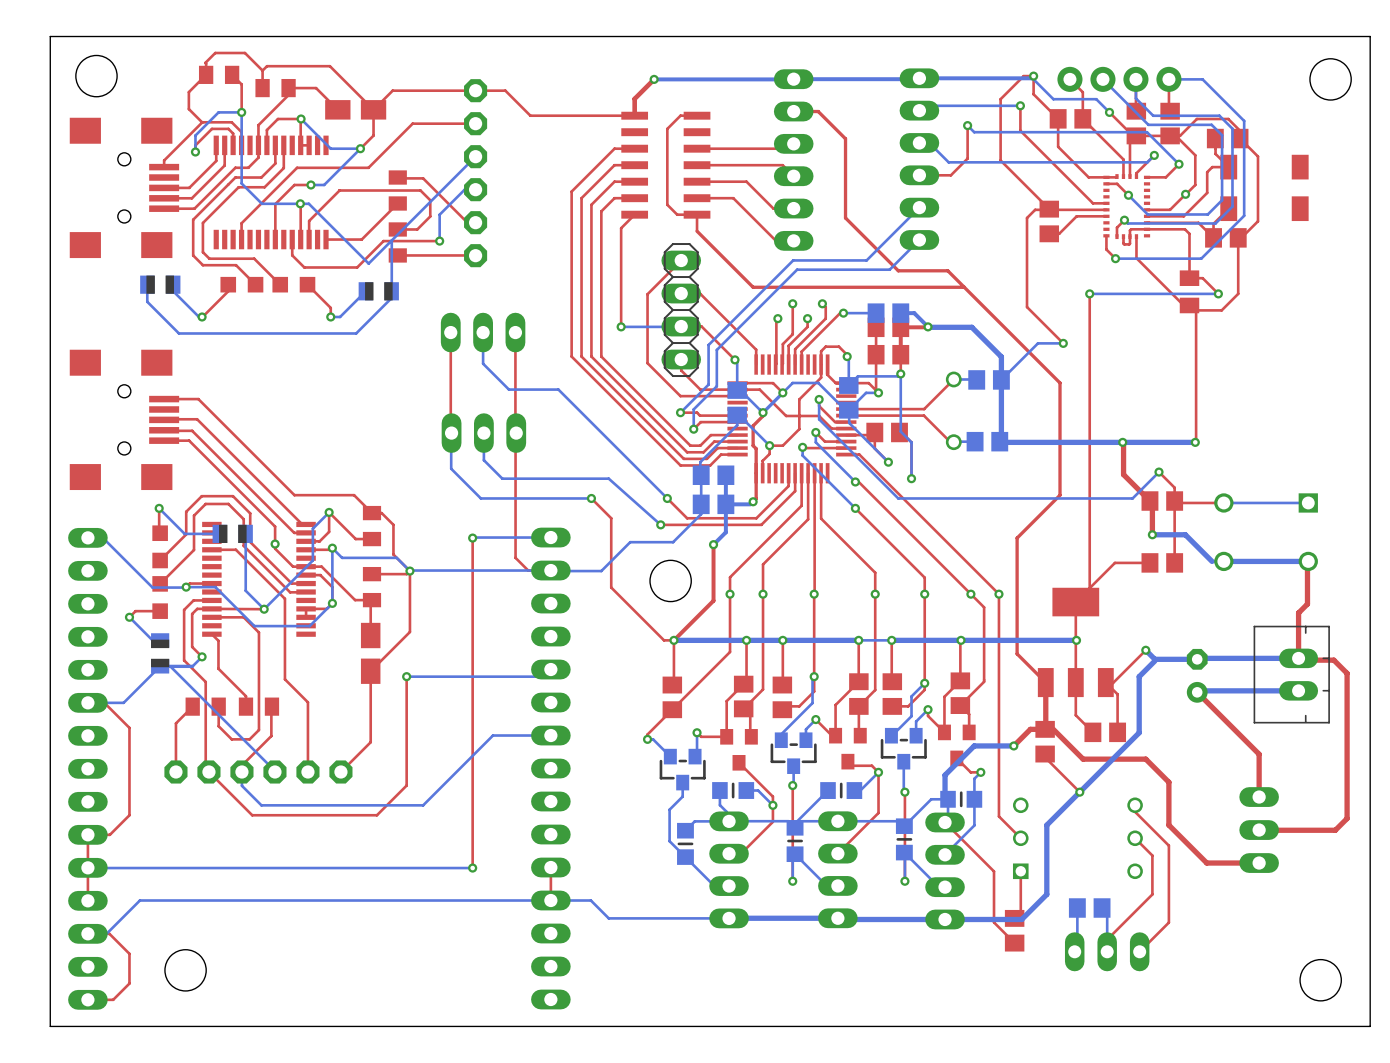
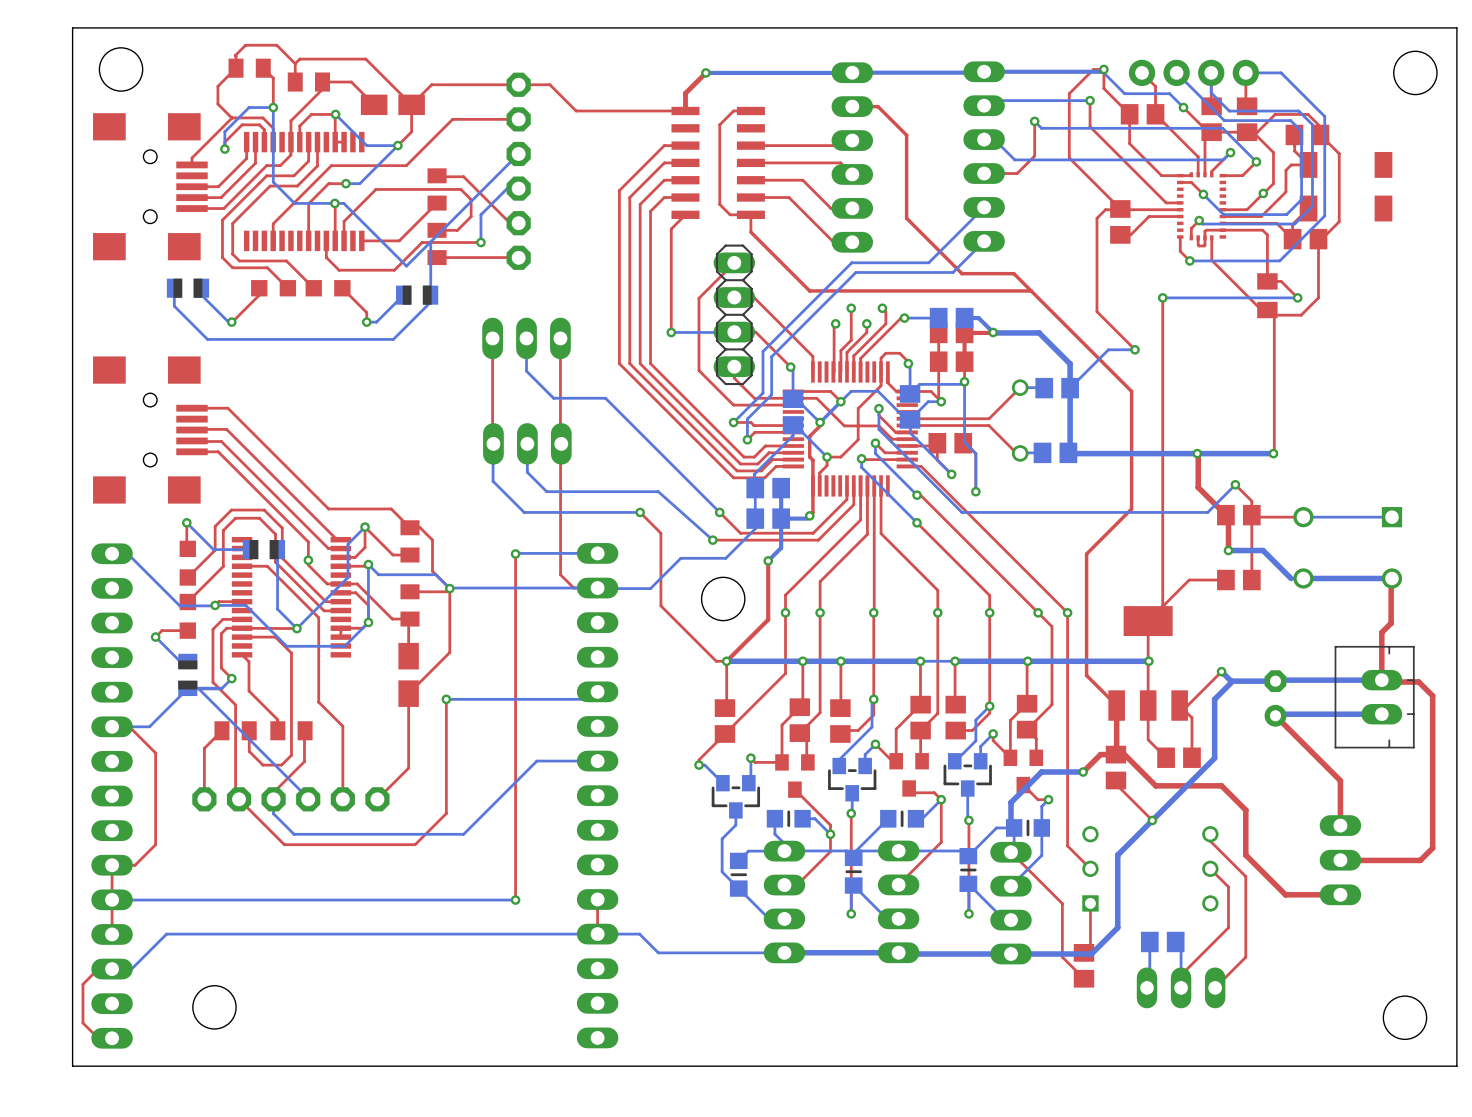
top track: (87, 933) (109, 933) (129, 953) (129, 983) (113, 999) (87, 999) -> (112, 969) (98, 969) (82, 984) (82, 1023) (98, 1038) (112, 1038)

